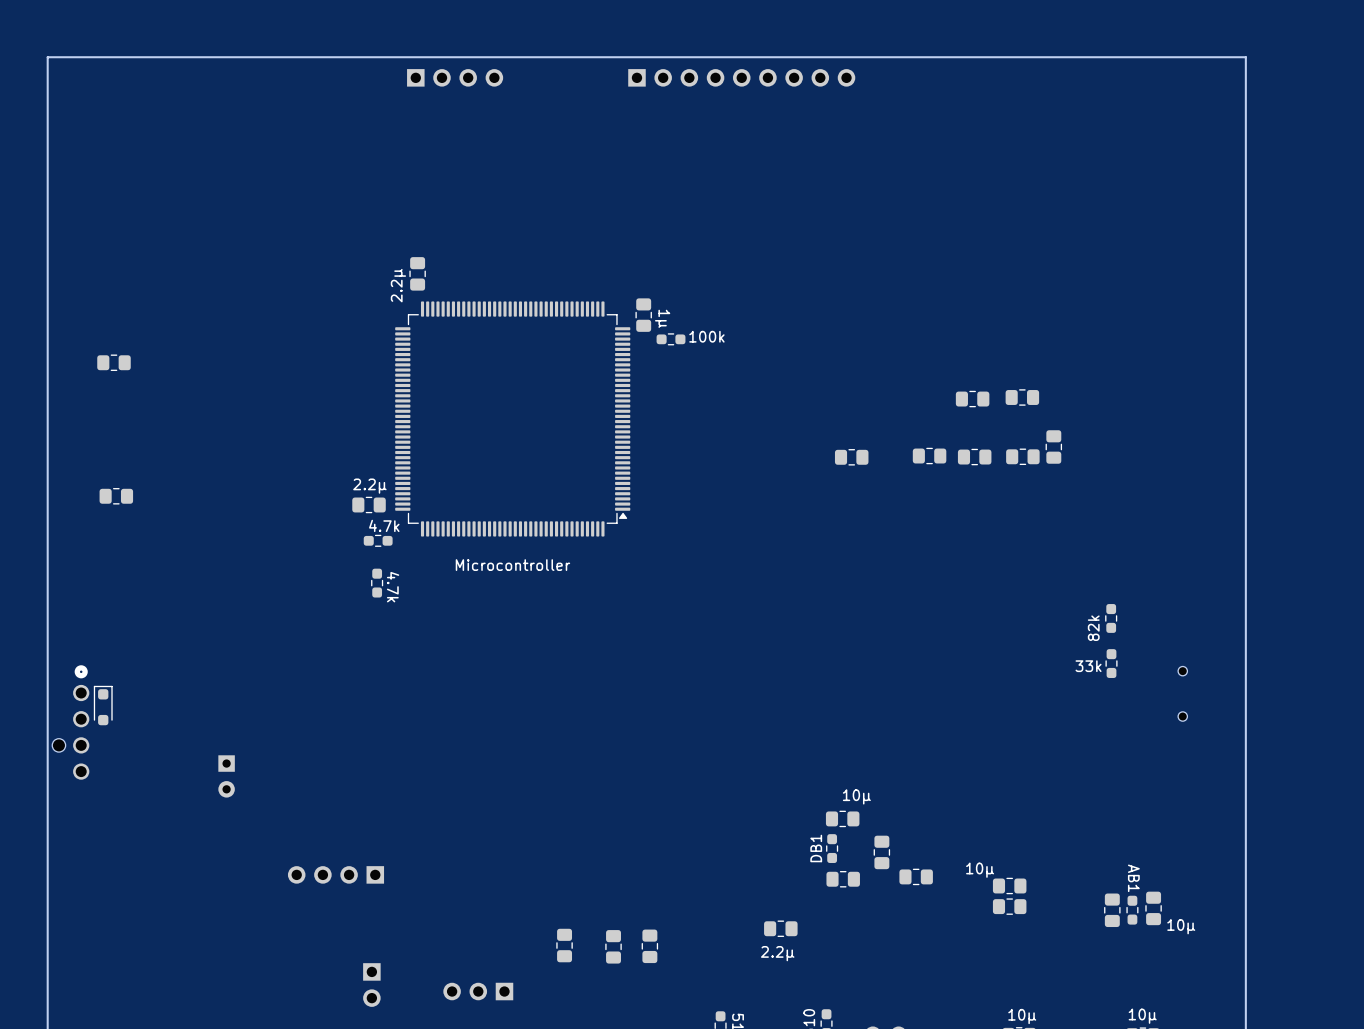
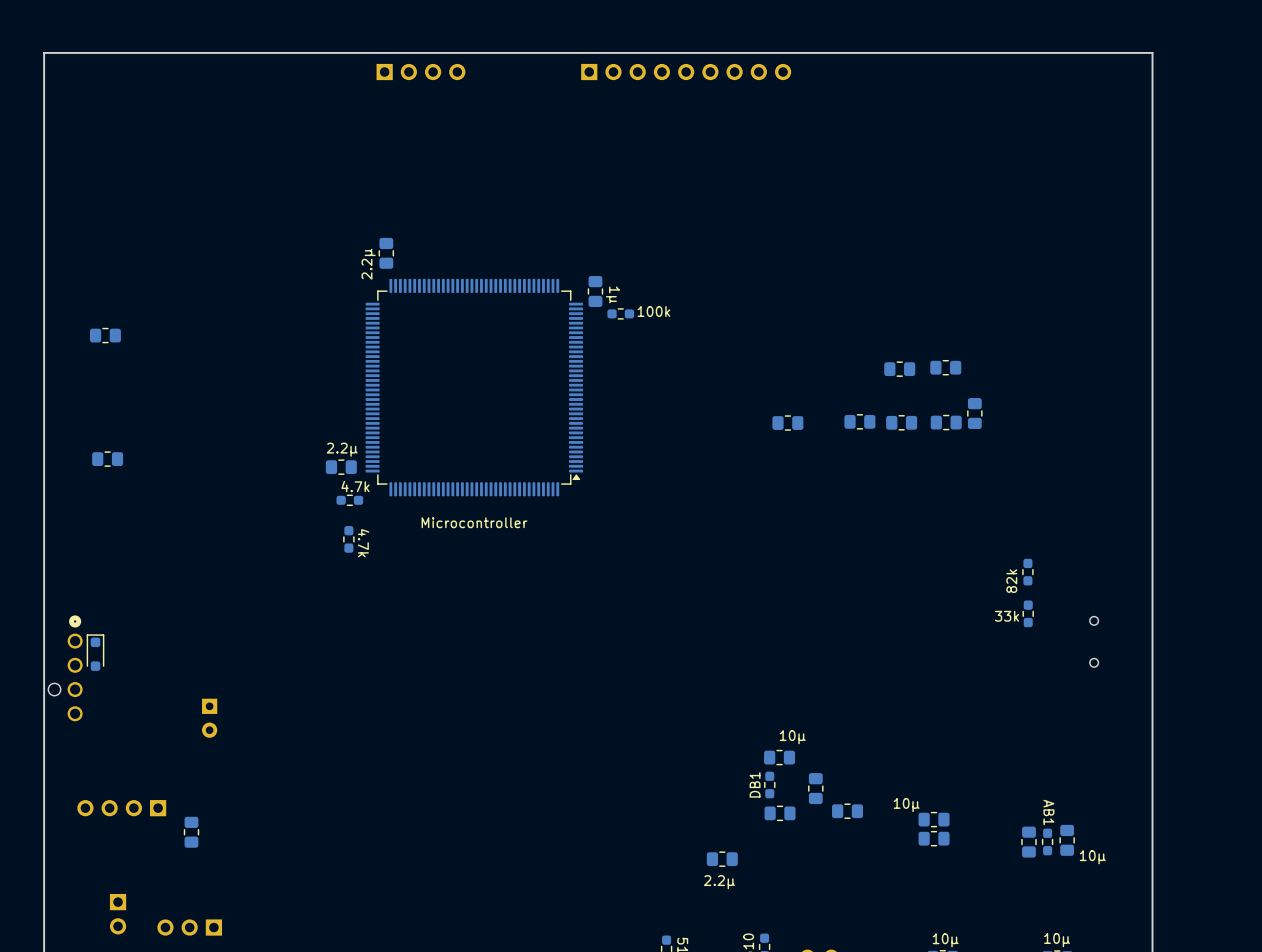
part position: (336, 874) -> (121, 808)
part: none -> (191, 832)
part: (564, 945) -> none
part: (613, 946) -> none
part: (649, 946) -> none
part position: (371, 985) -> (118, 914)
part: (478, 991) -> none
part: none -> (189, 927)

